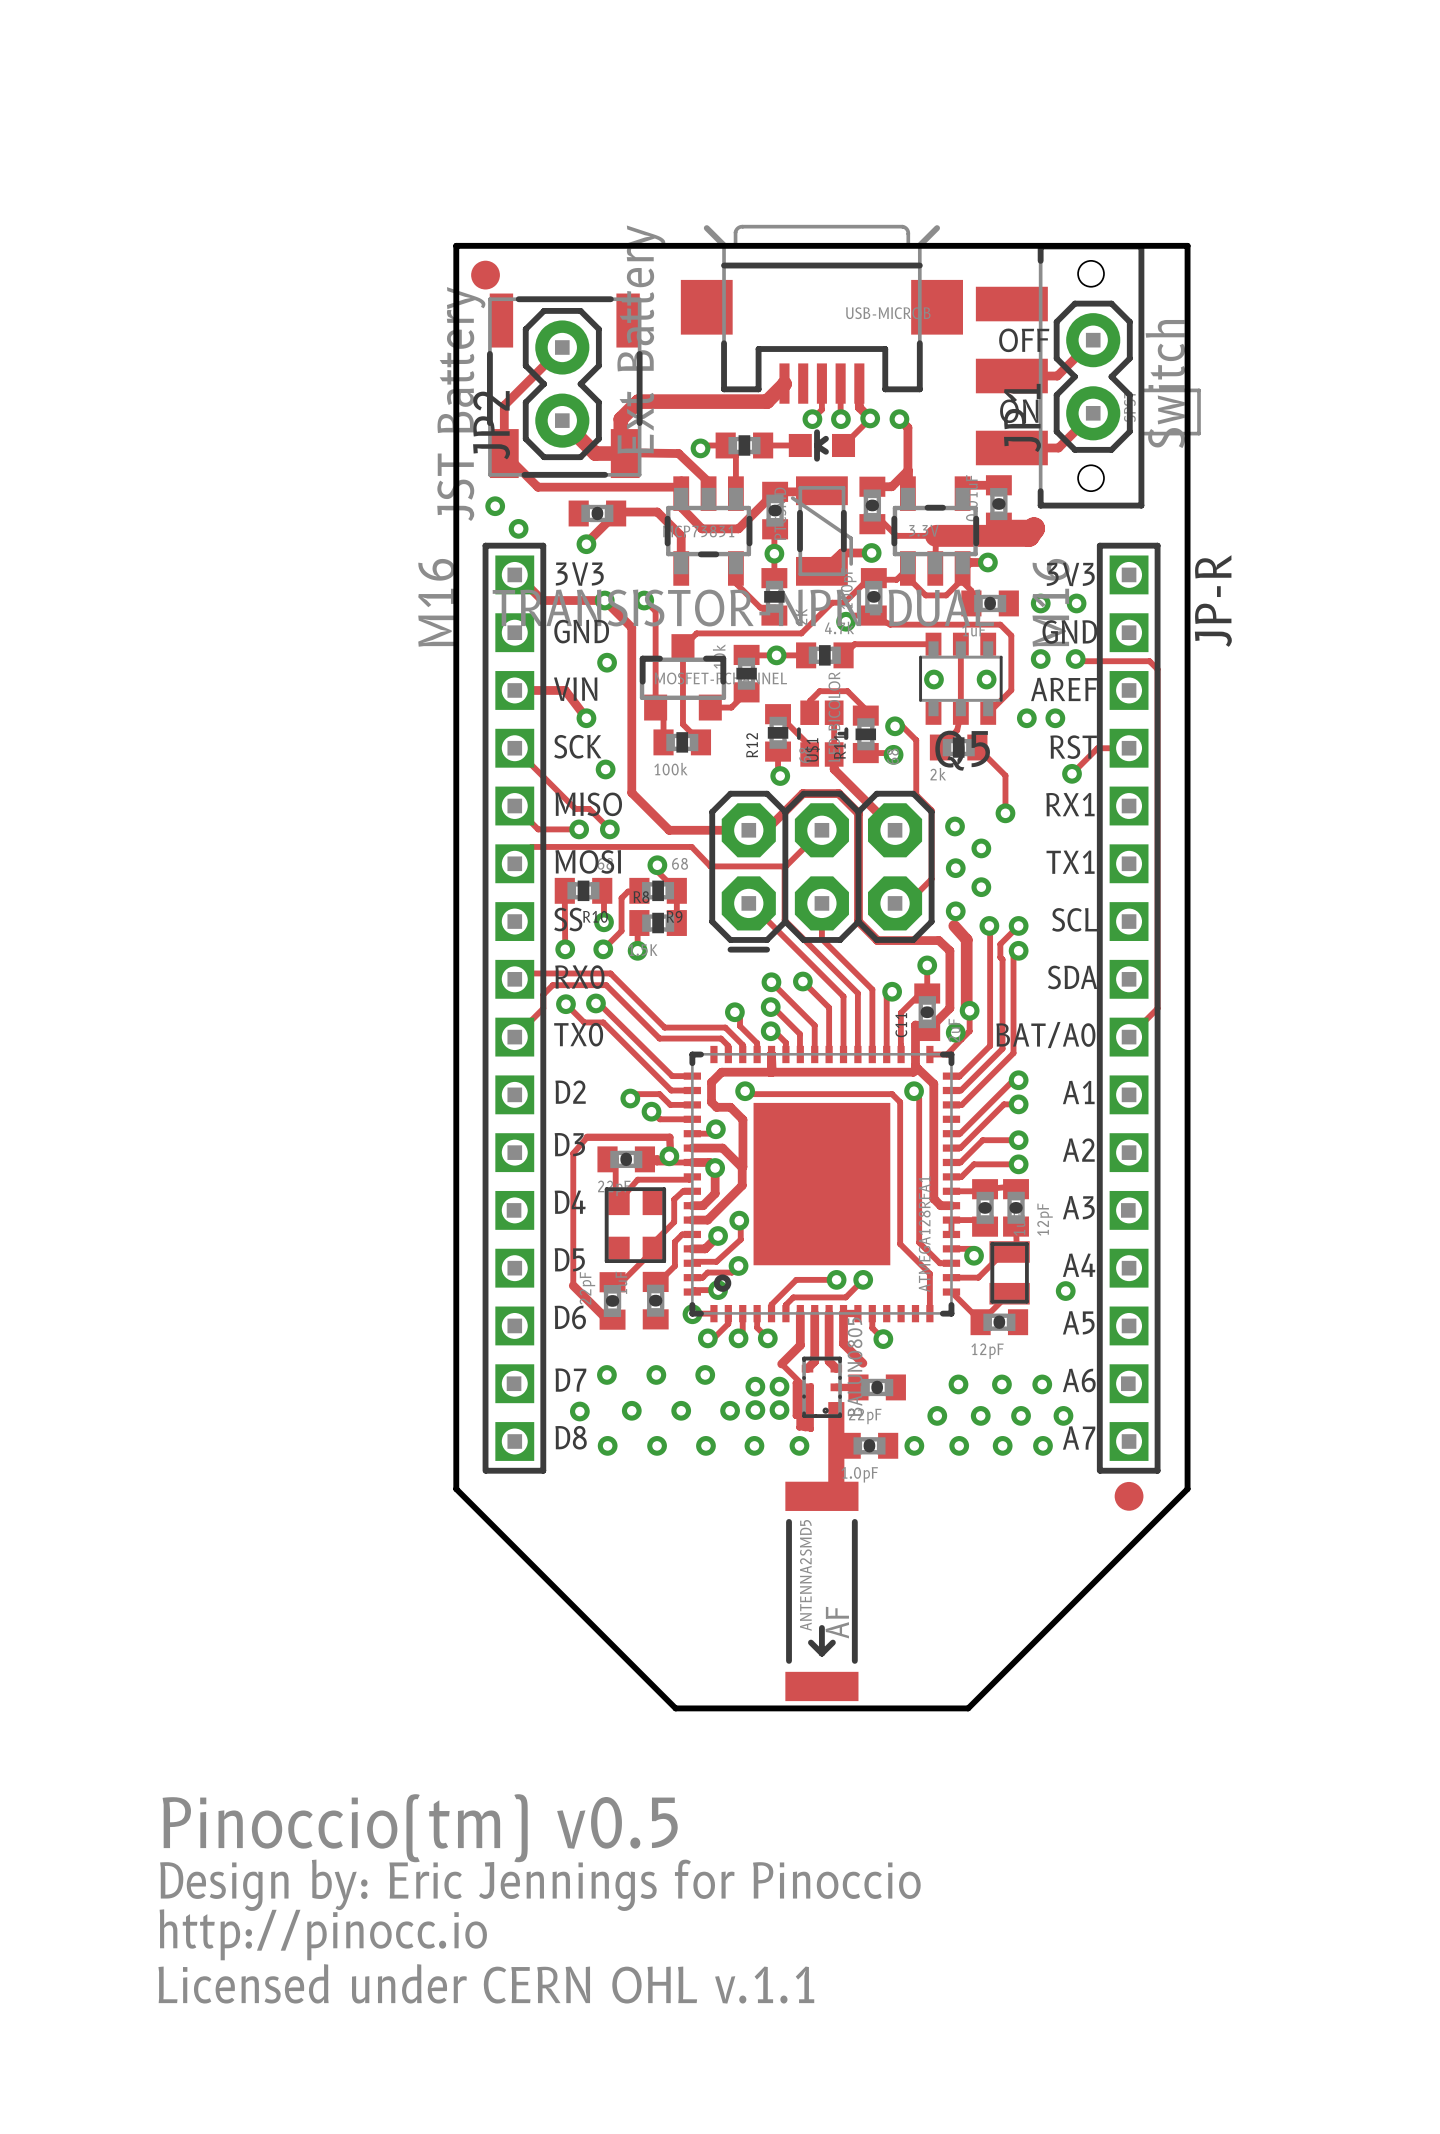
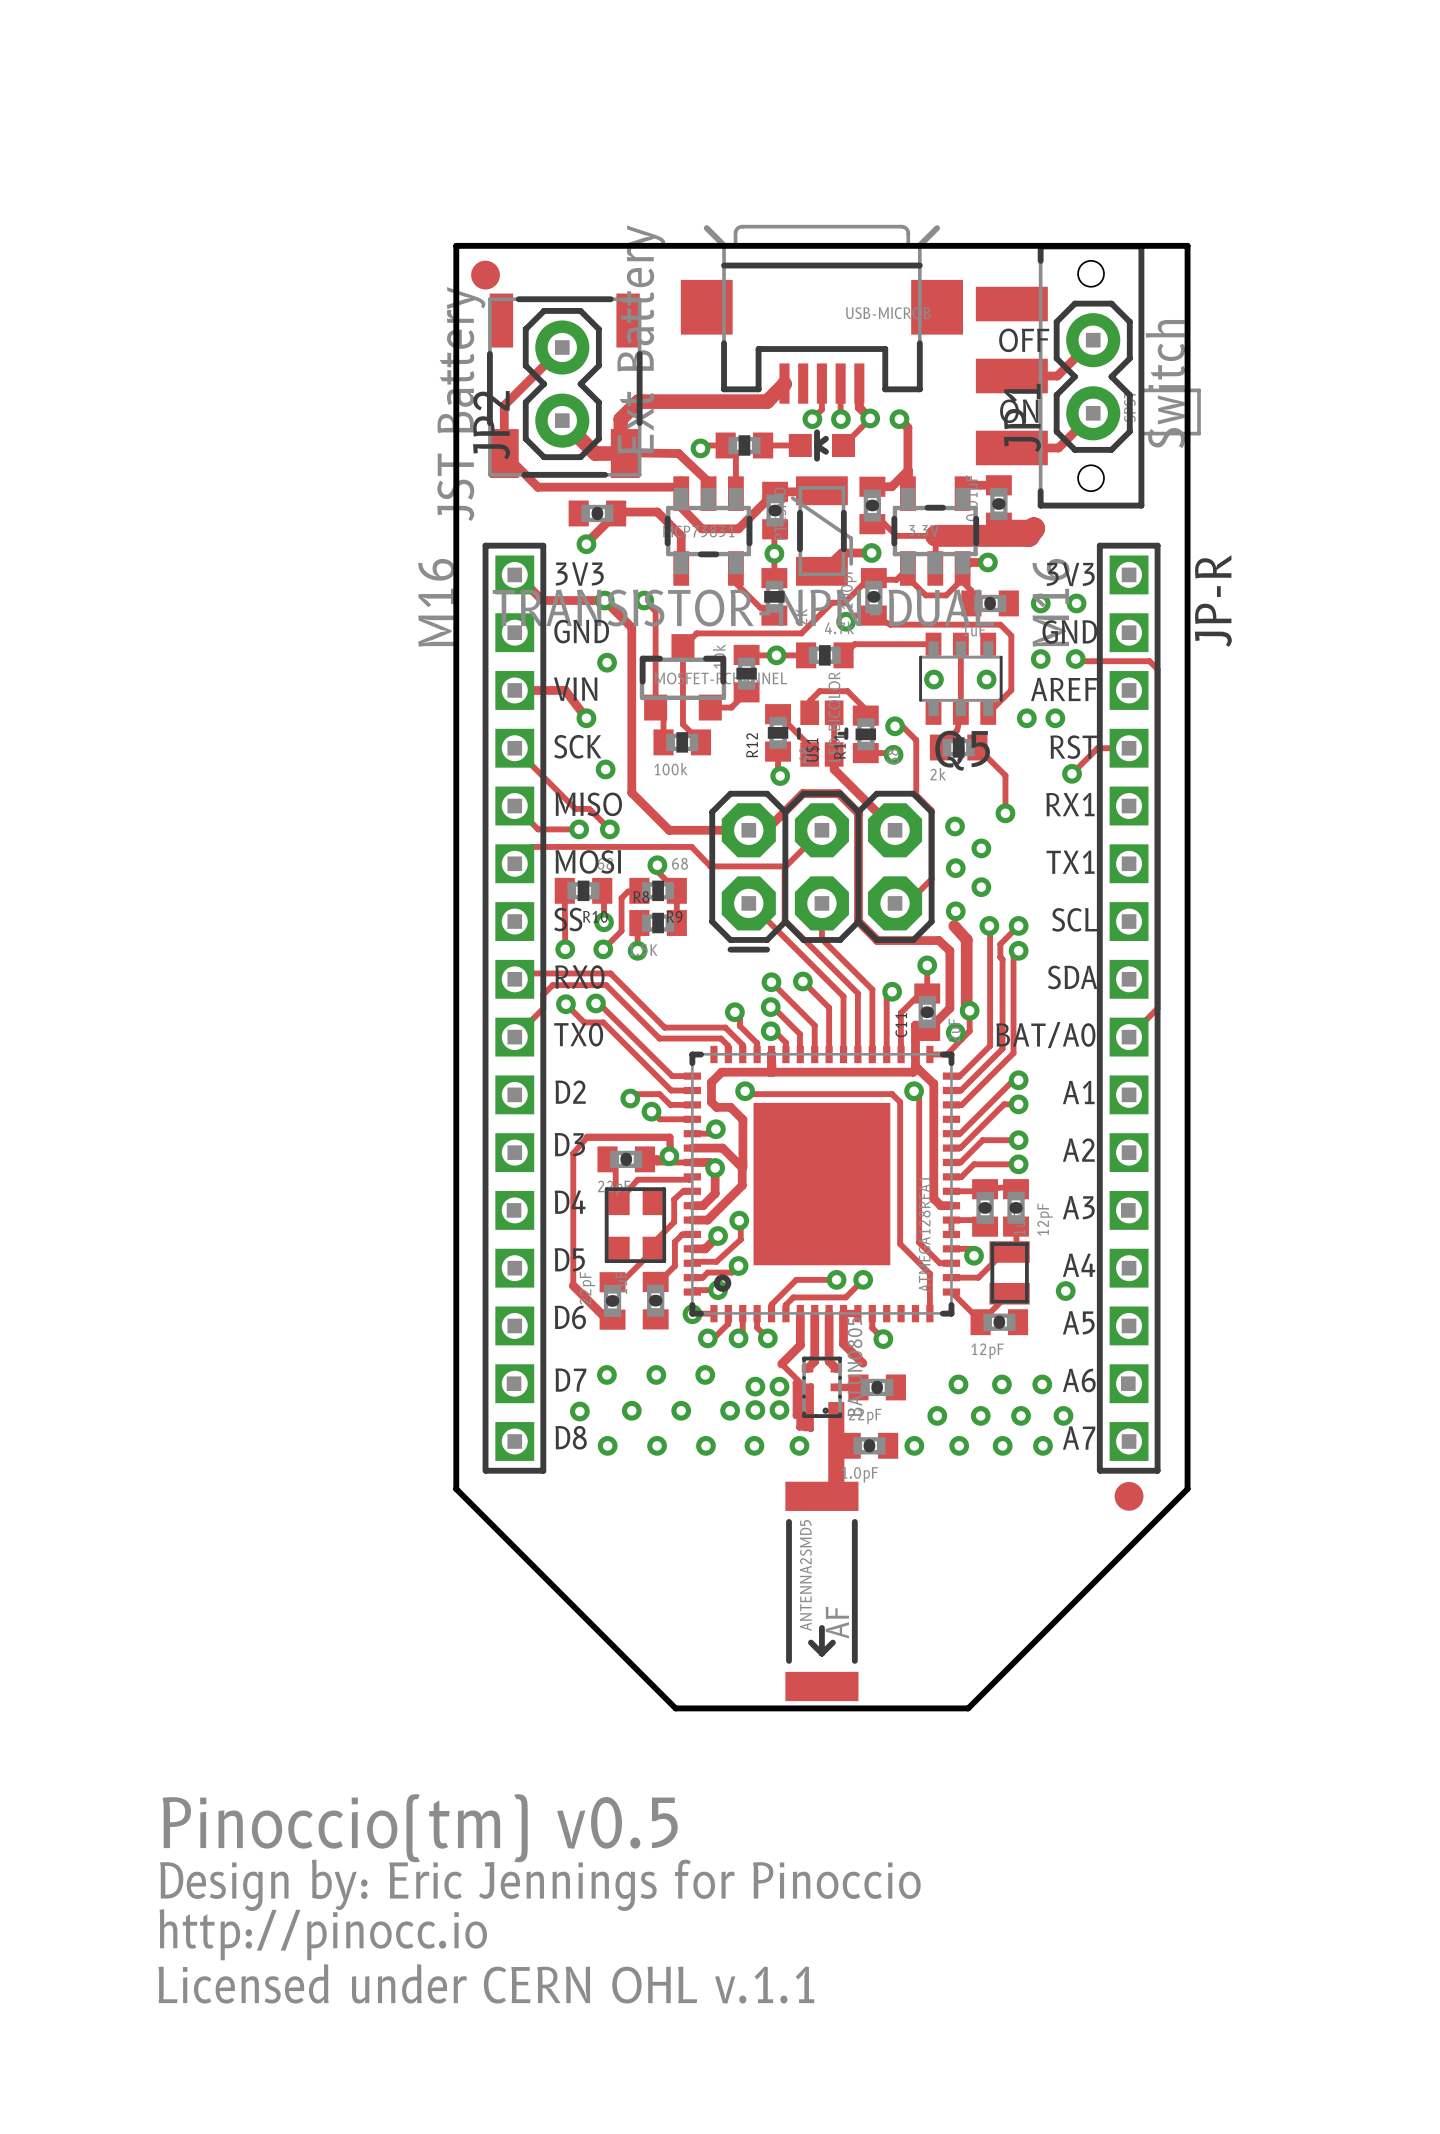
via: (495, 506) -> none
via: (518, 528) -> none

